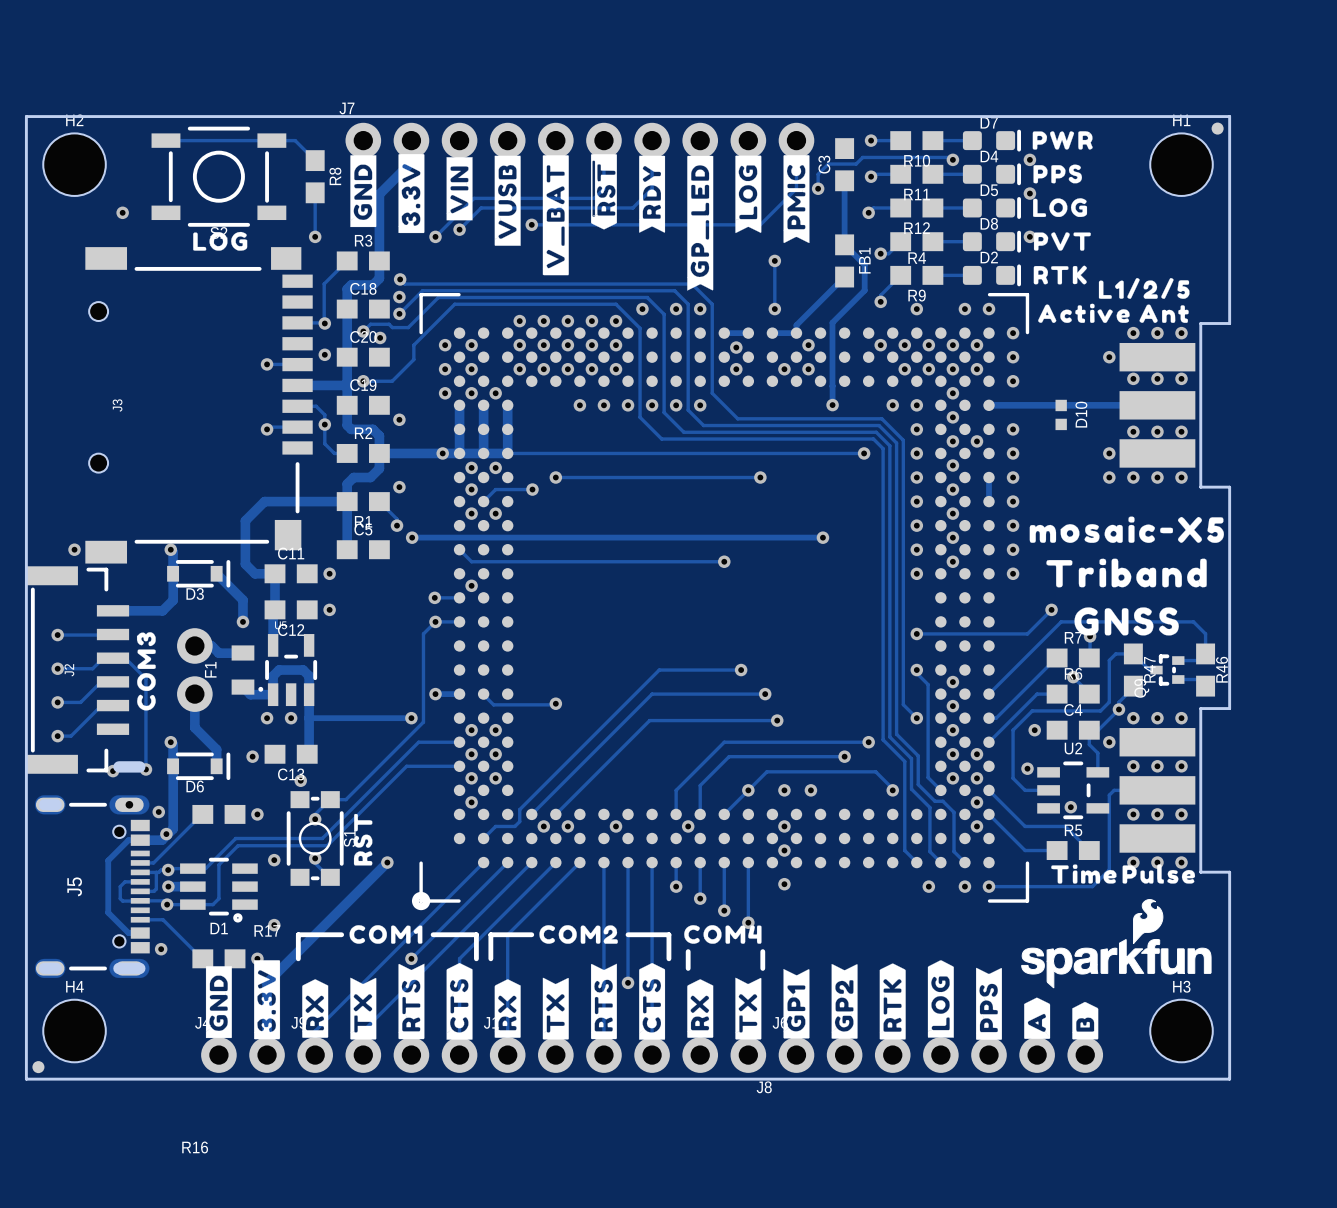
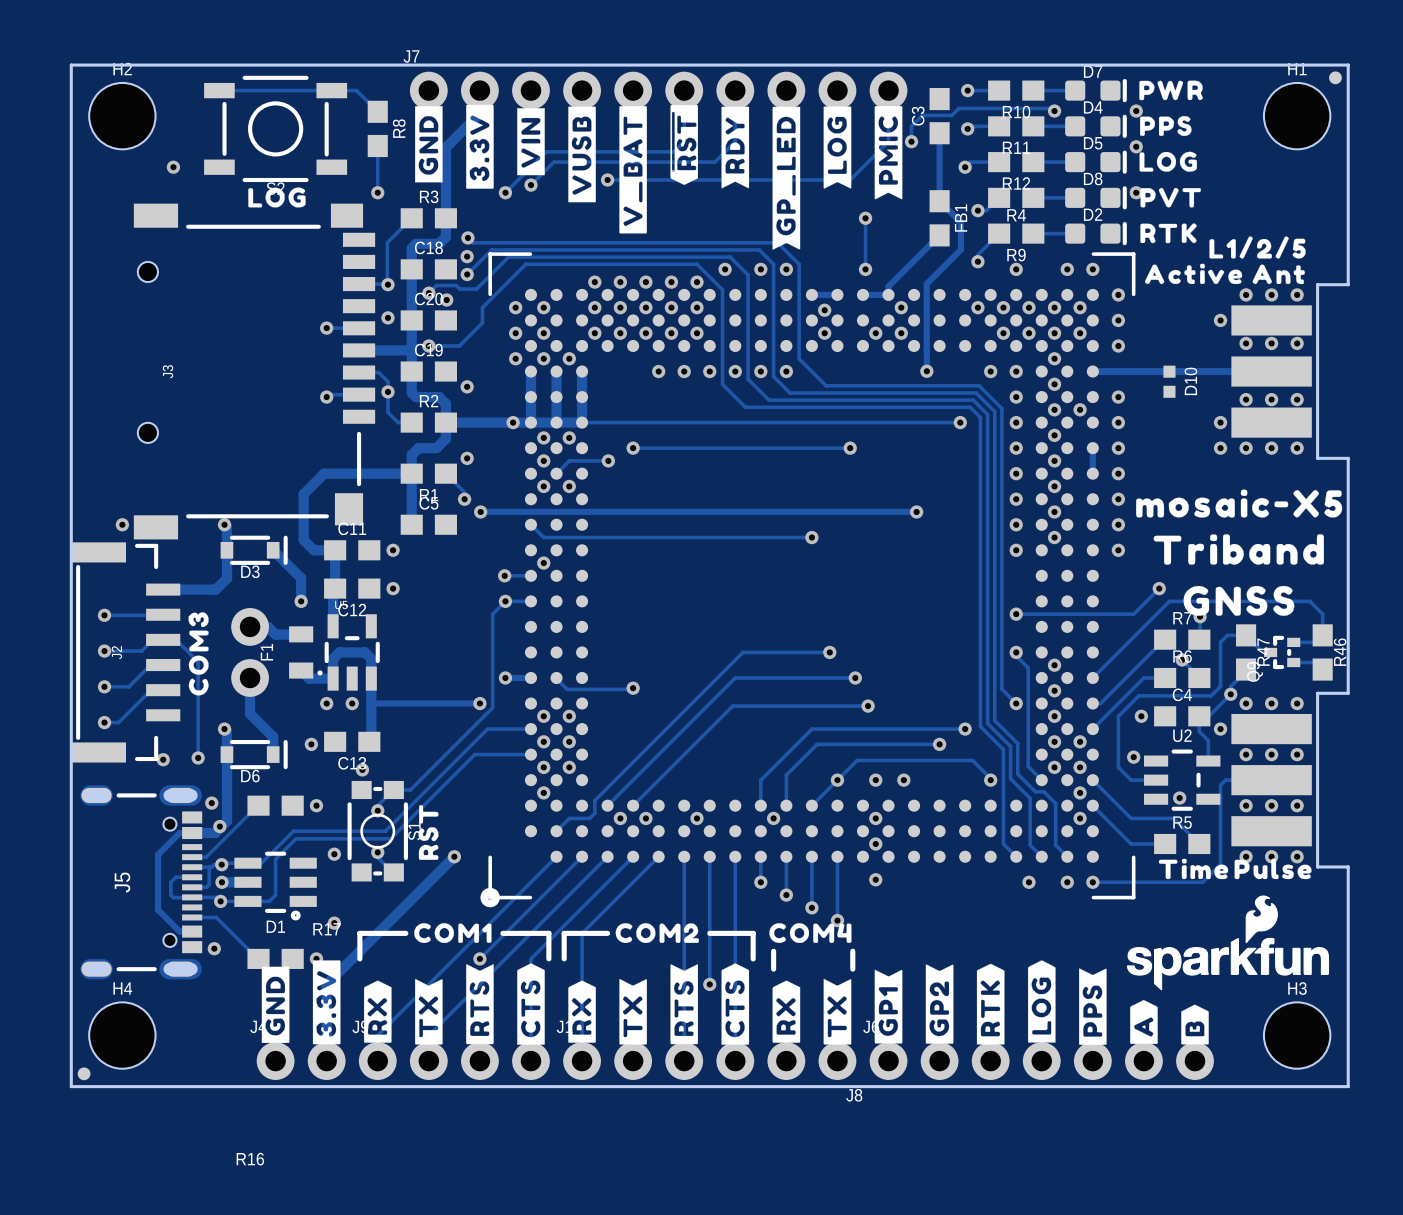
J5 footprint: [34, 761, 150, 979] -> [80, 785, 203, 980]

